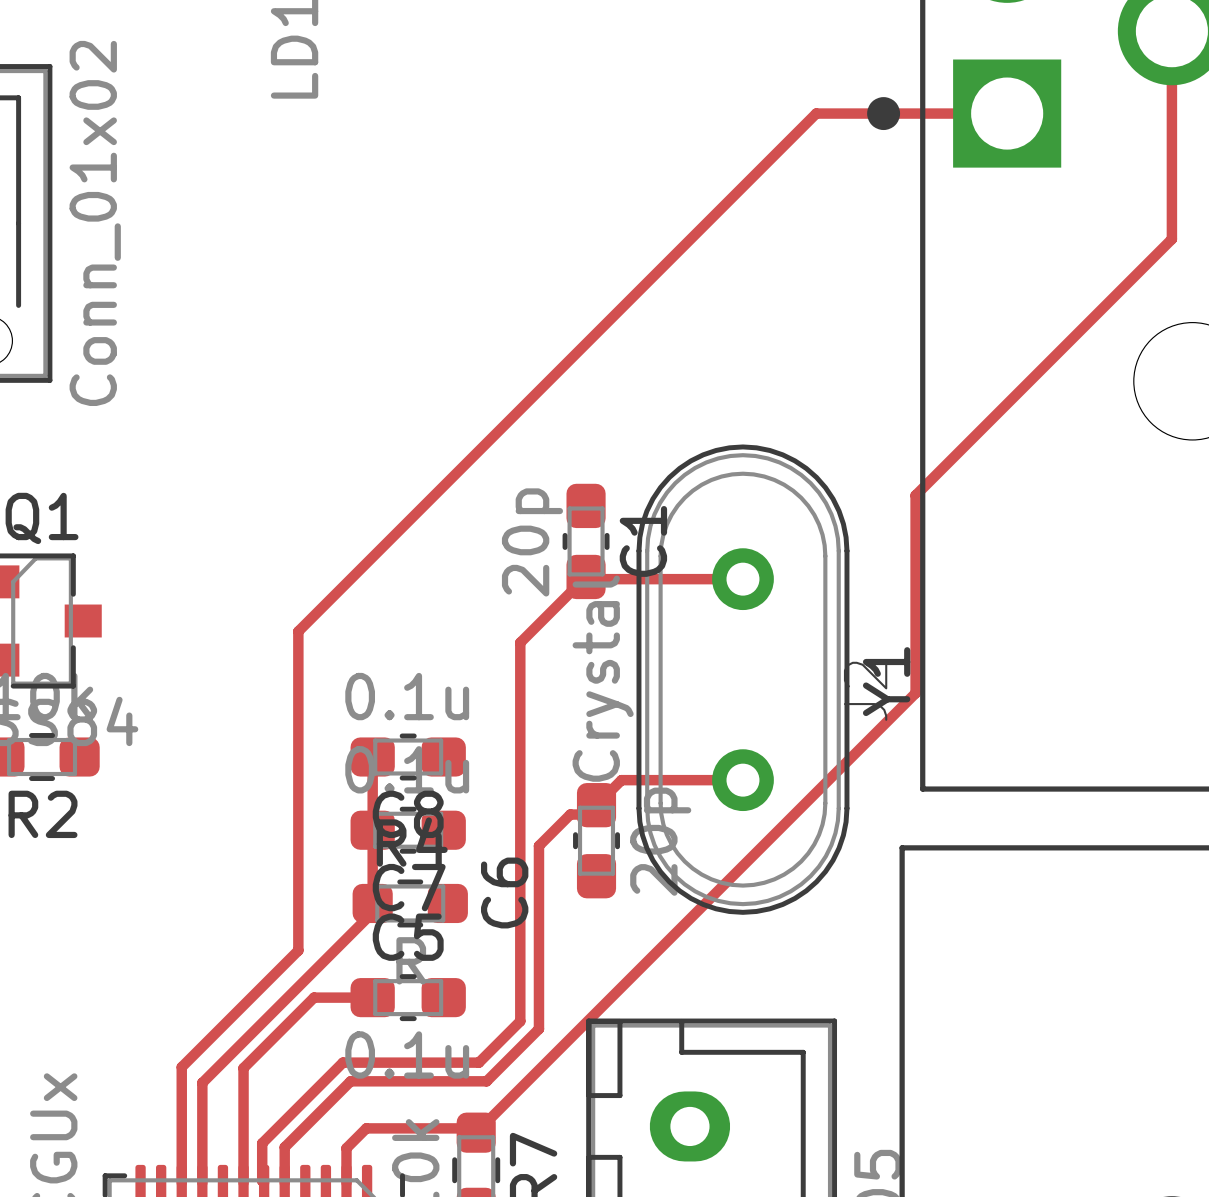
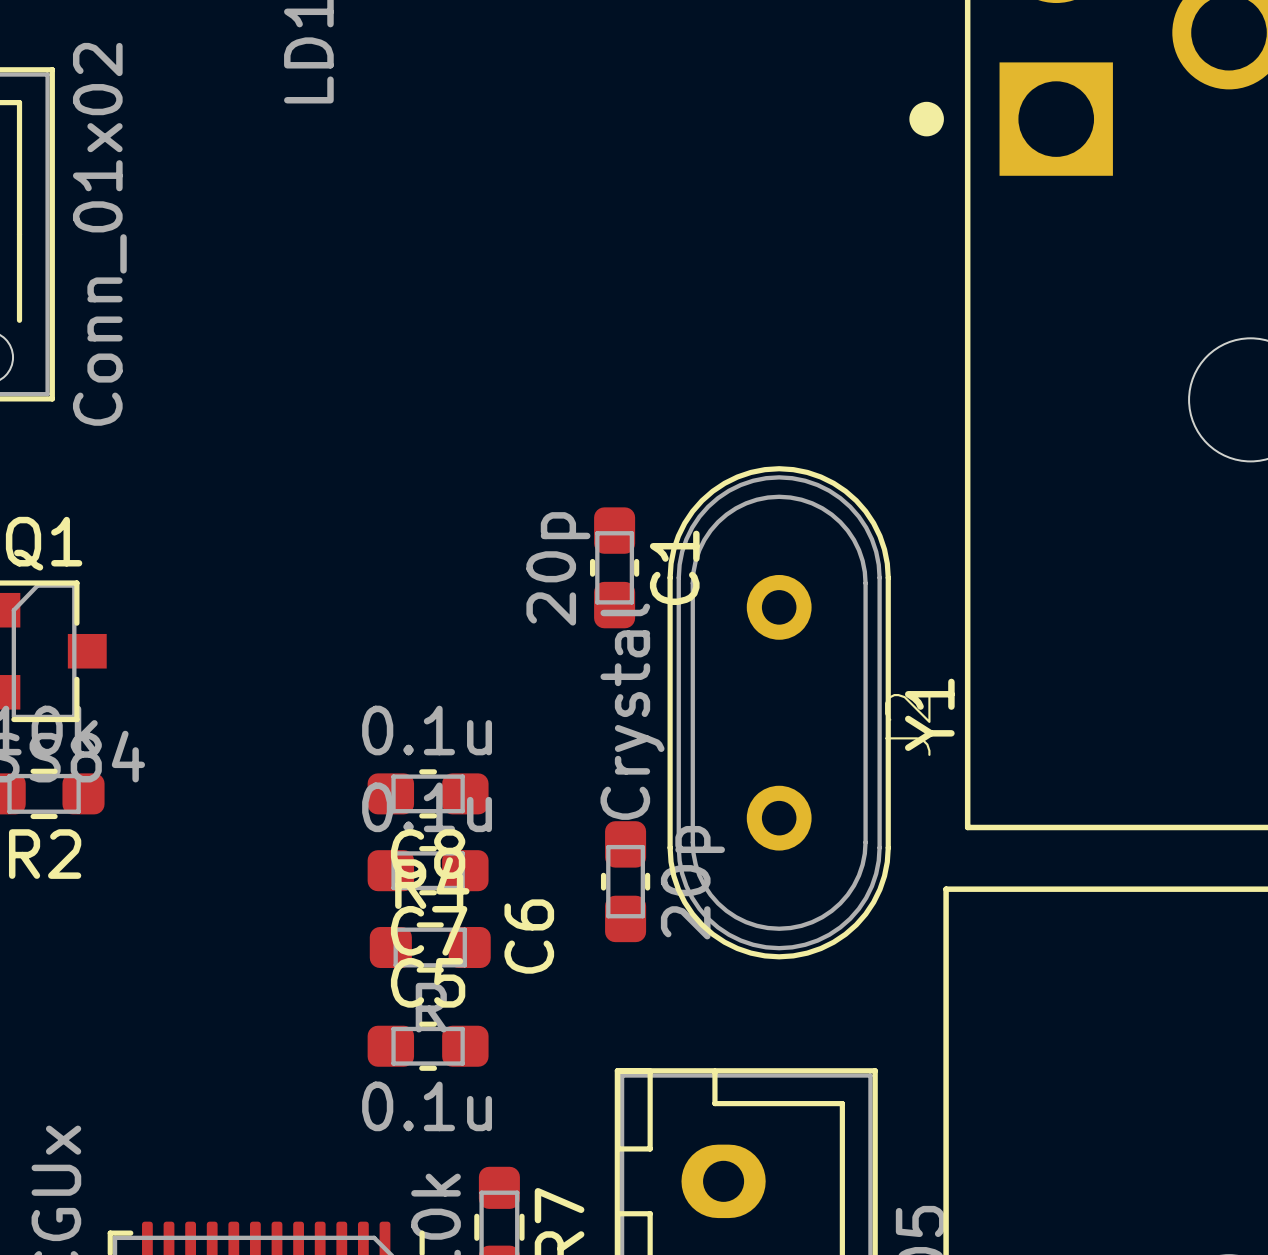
top track: (1171, 31) (1171, 239) (915, 495) (915, 693) (476, 1132) (471, 1128) (366, 1128) (346, 1148) (346, 1182) -> none
top track: (1007, 113) (816, 113) (298, 631) (298, 950) (181, 1067) (181, 1182) -> none
top track: (742, 579) (588, 579) (586, 576) (520, 642) (520, 1021) (478, 1062) (342, 1062) (262, 1143) (262, 1180) (264, 1182) -> none
top track: (372, 757) (372, 912) (202, 1082) (202, 1182) -> none
top track: (742, 780) (621, 780) (587, 814) (570, 814) (538, 845) (538, 1029) (486, 1081) (350, 1081) (284, 1147) (284, 1182) -> none
top track: (372, 997) (314, 997) (243, 1068) (243, 1182) -> none

